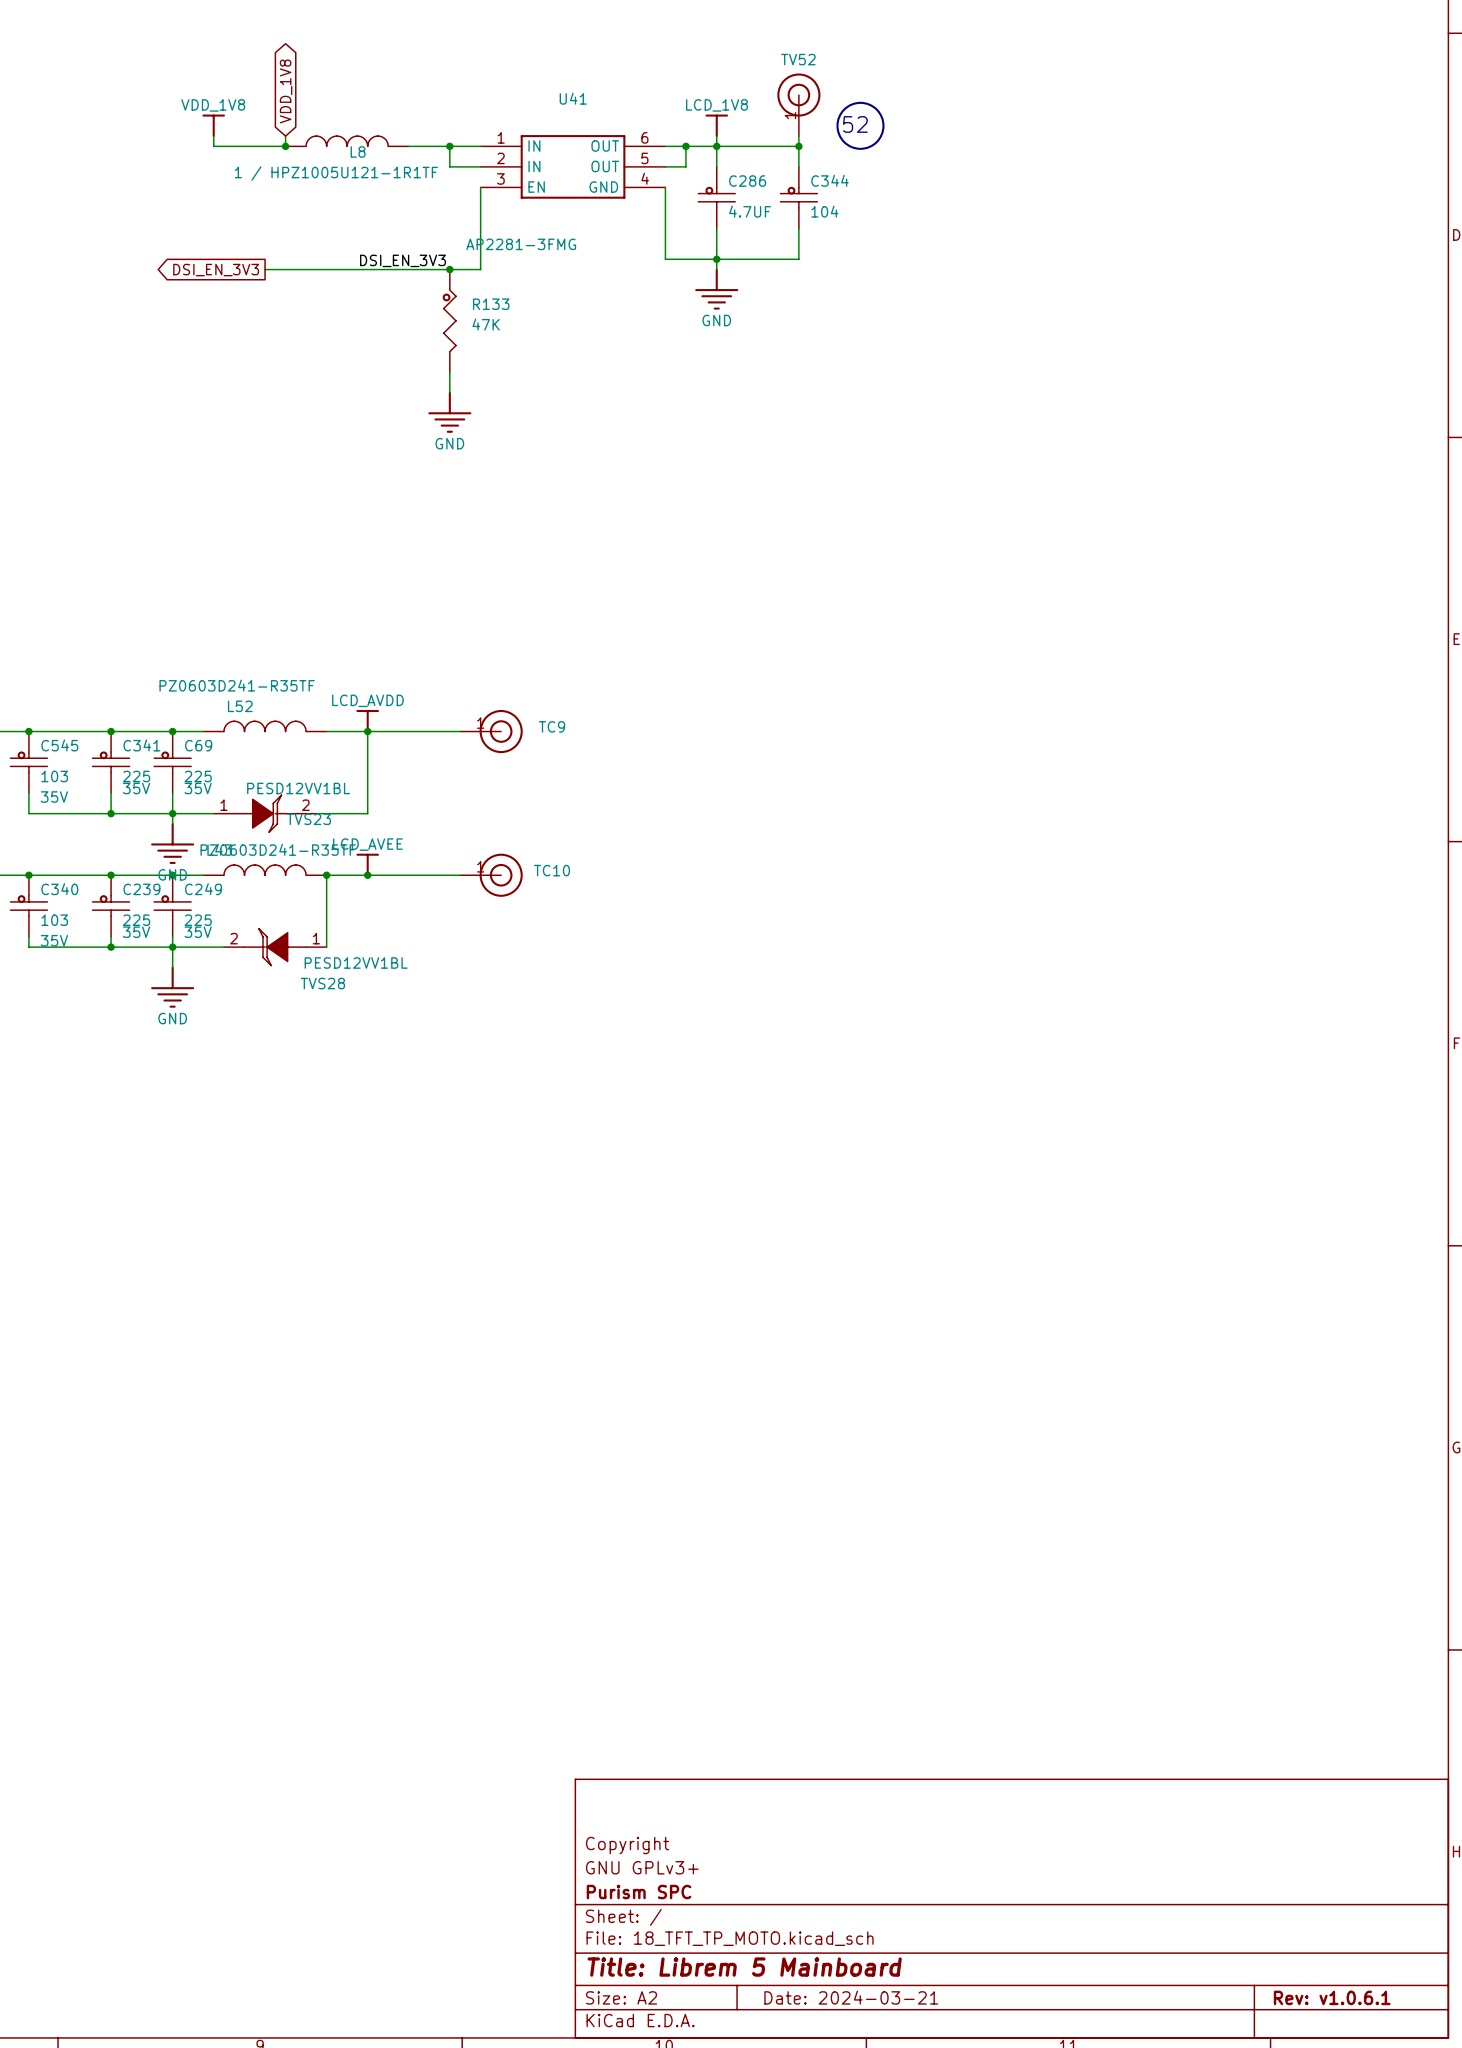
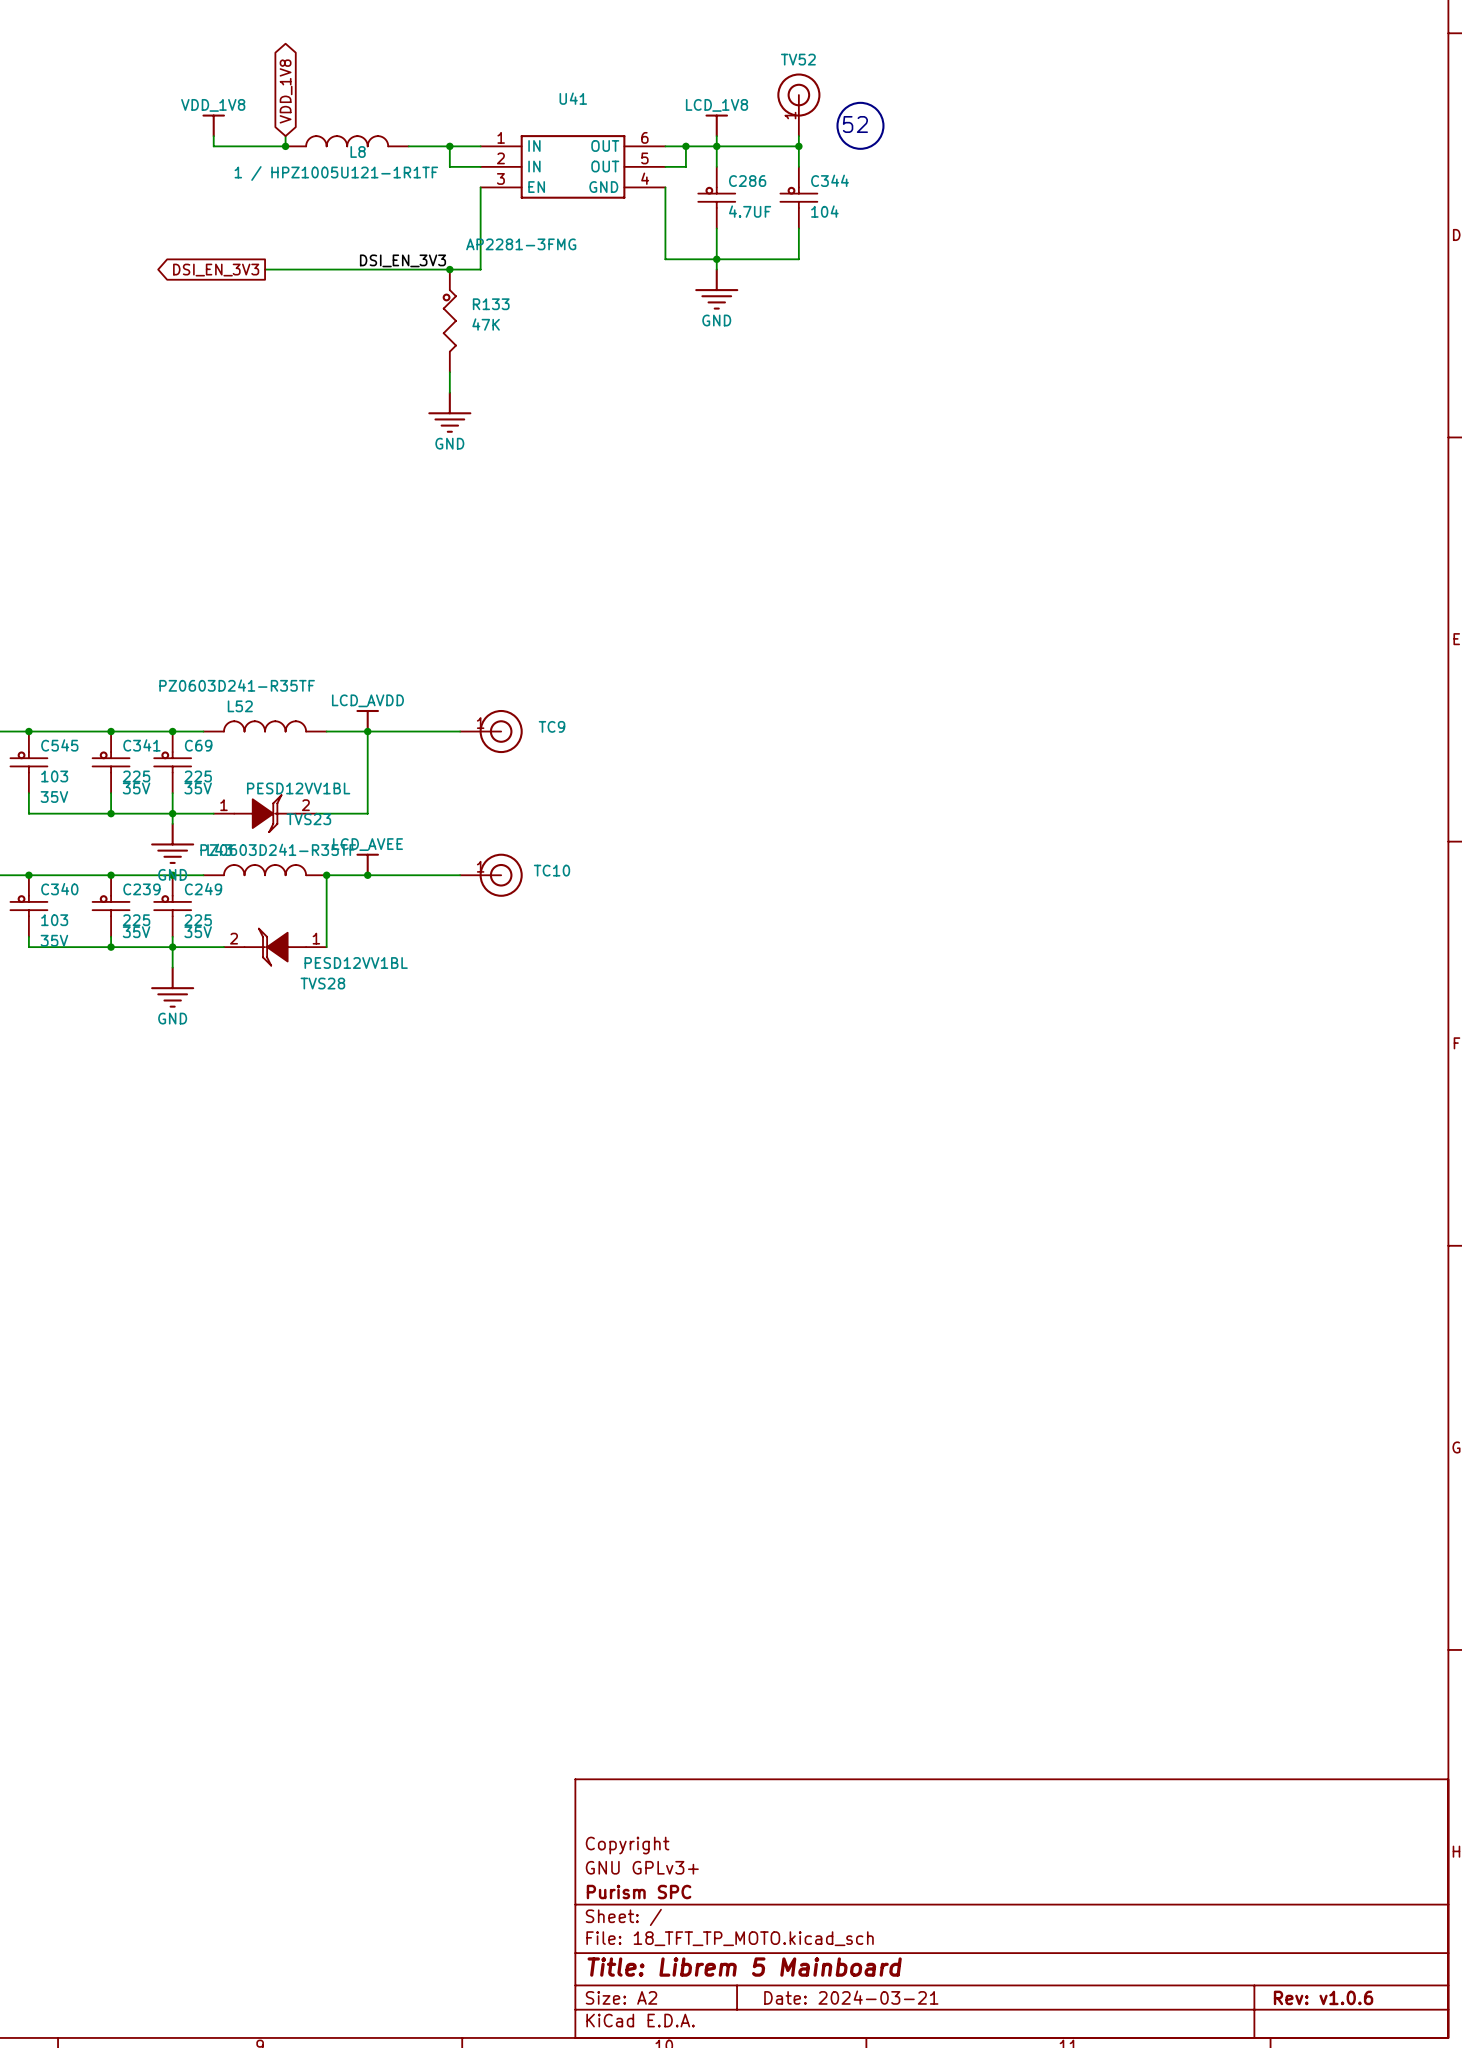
title block: Rev: v1.0.6.1 (1332, 1997) -> Rev: v1.0.6 (1323, 1997)

